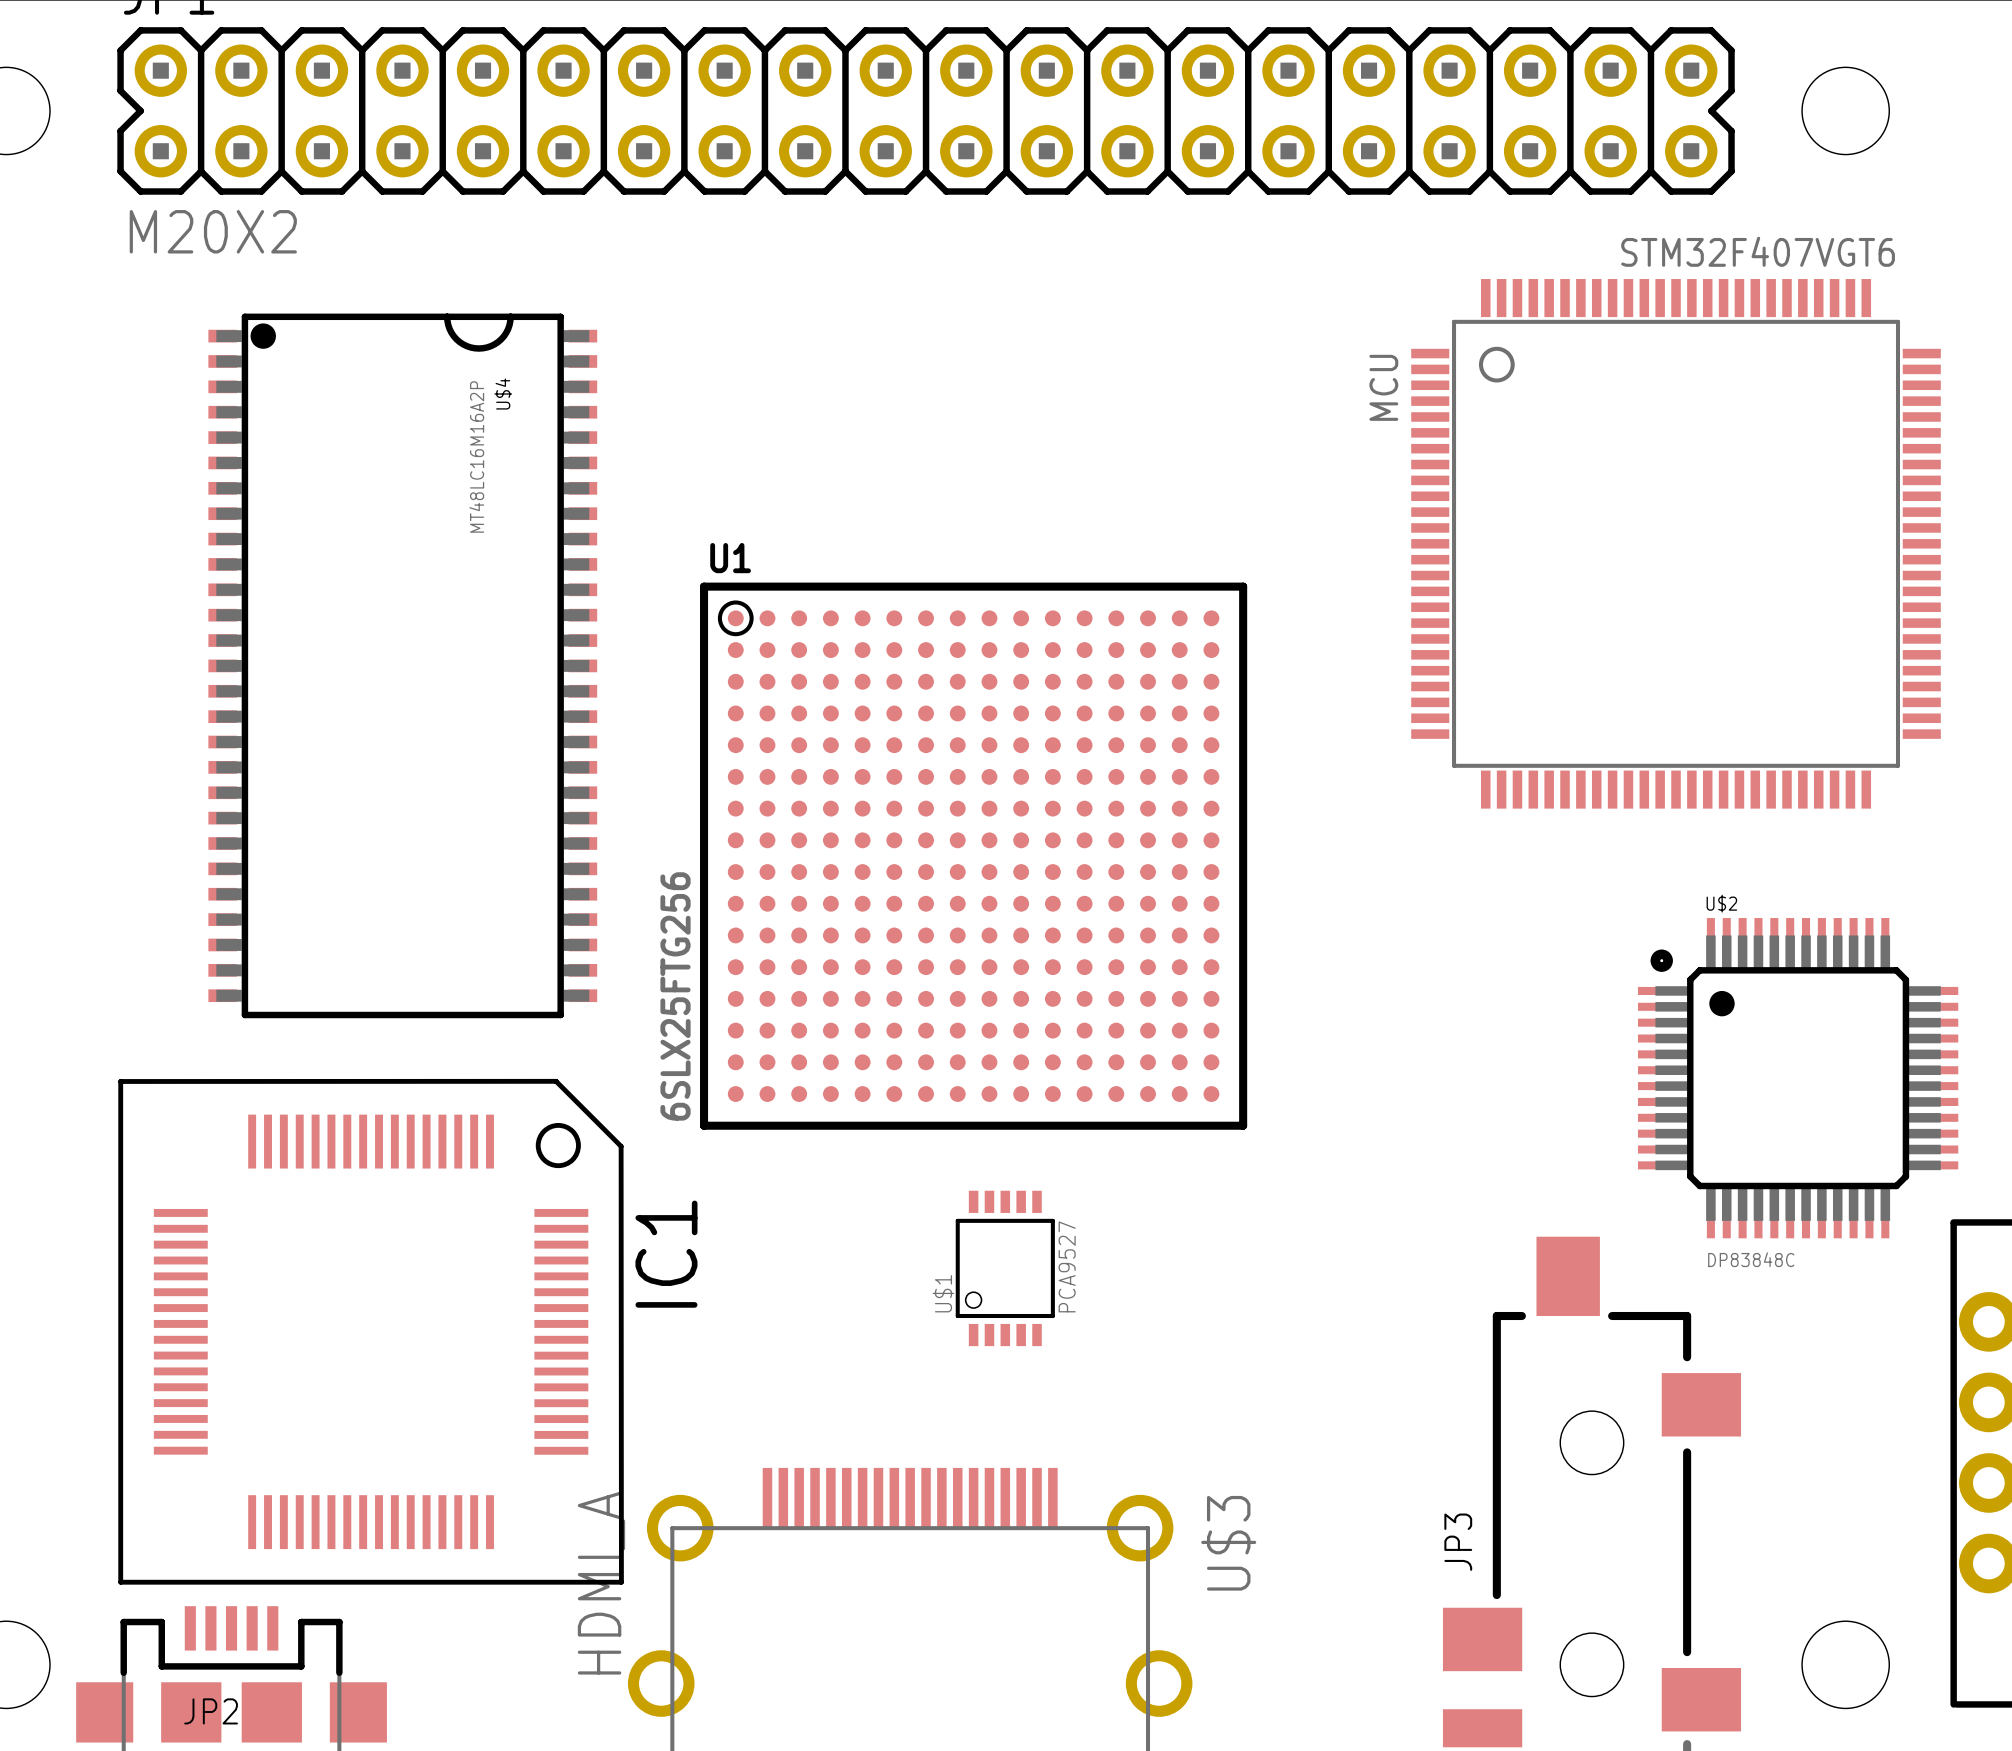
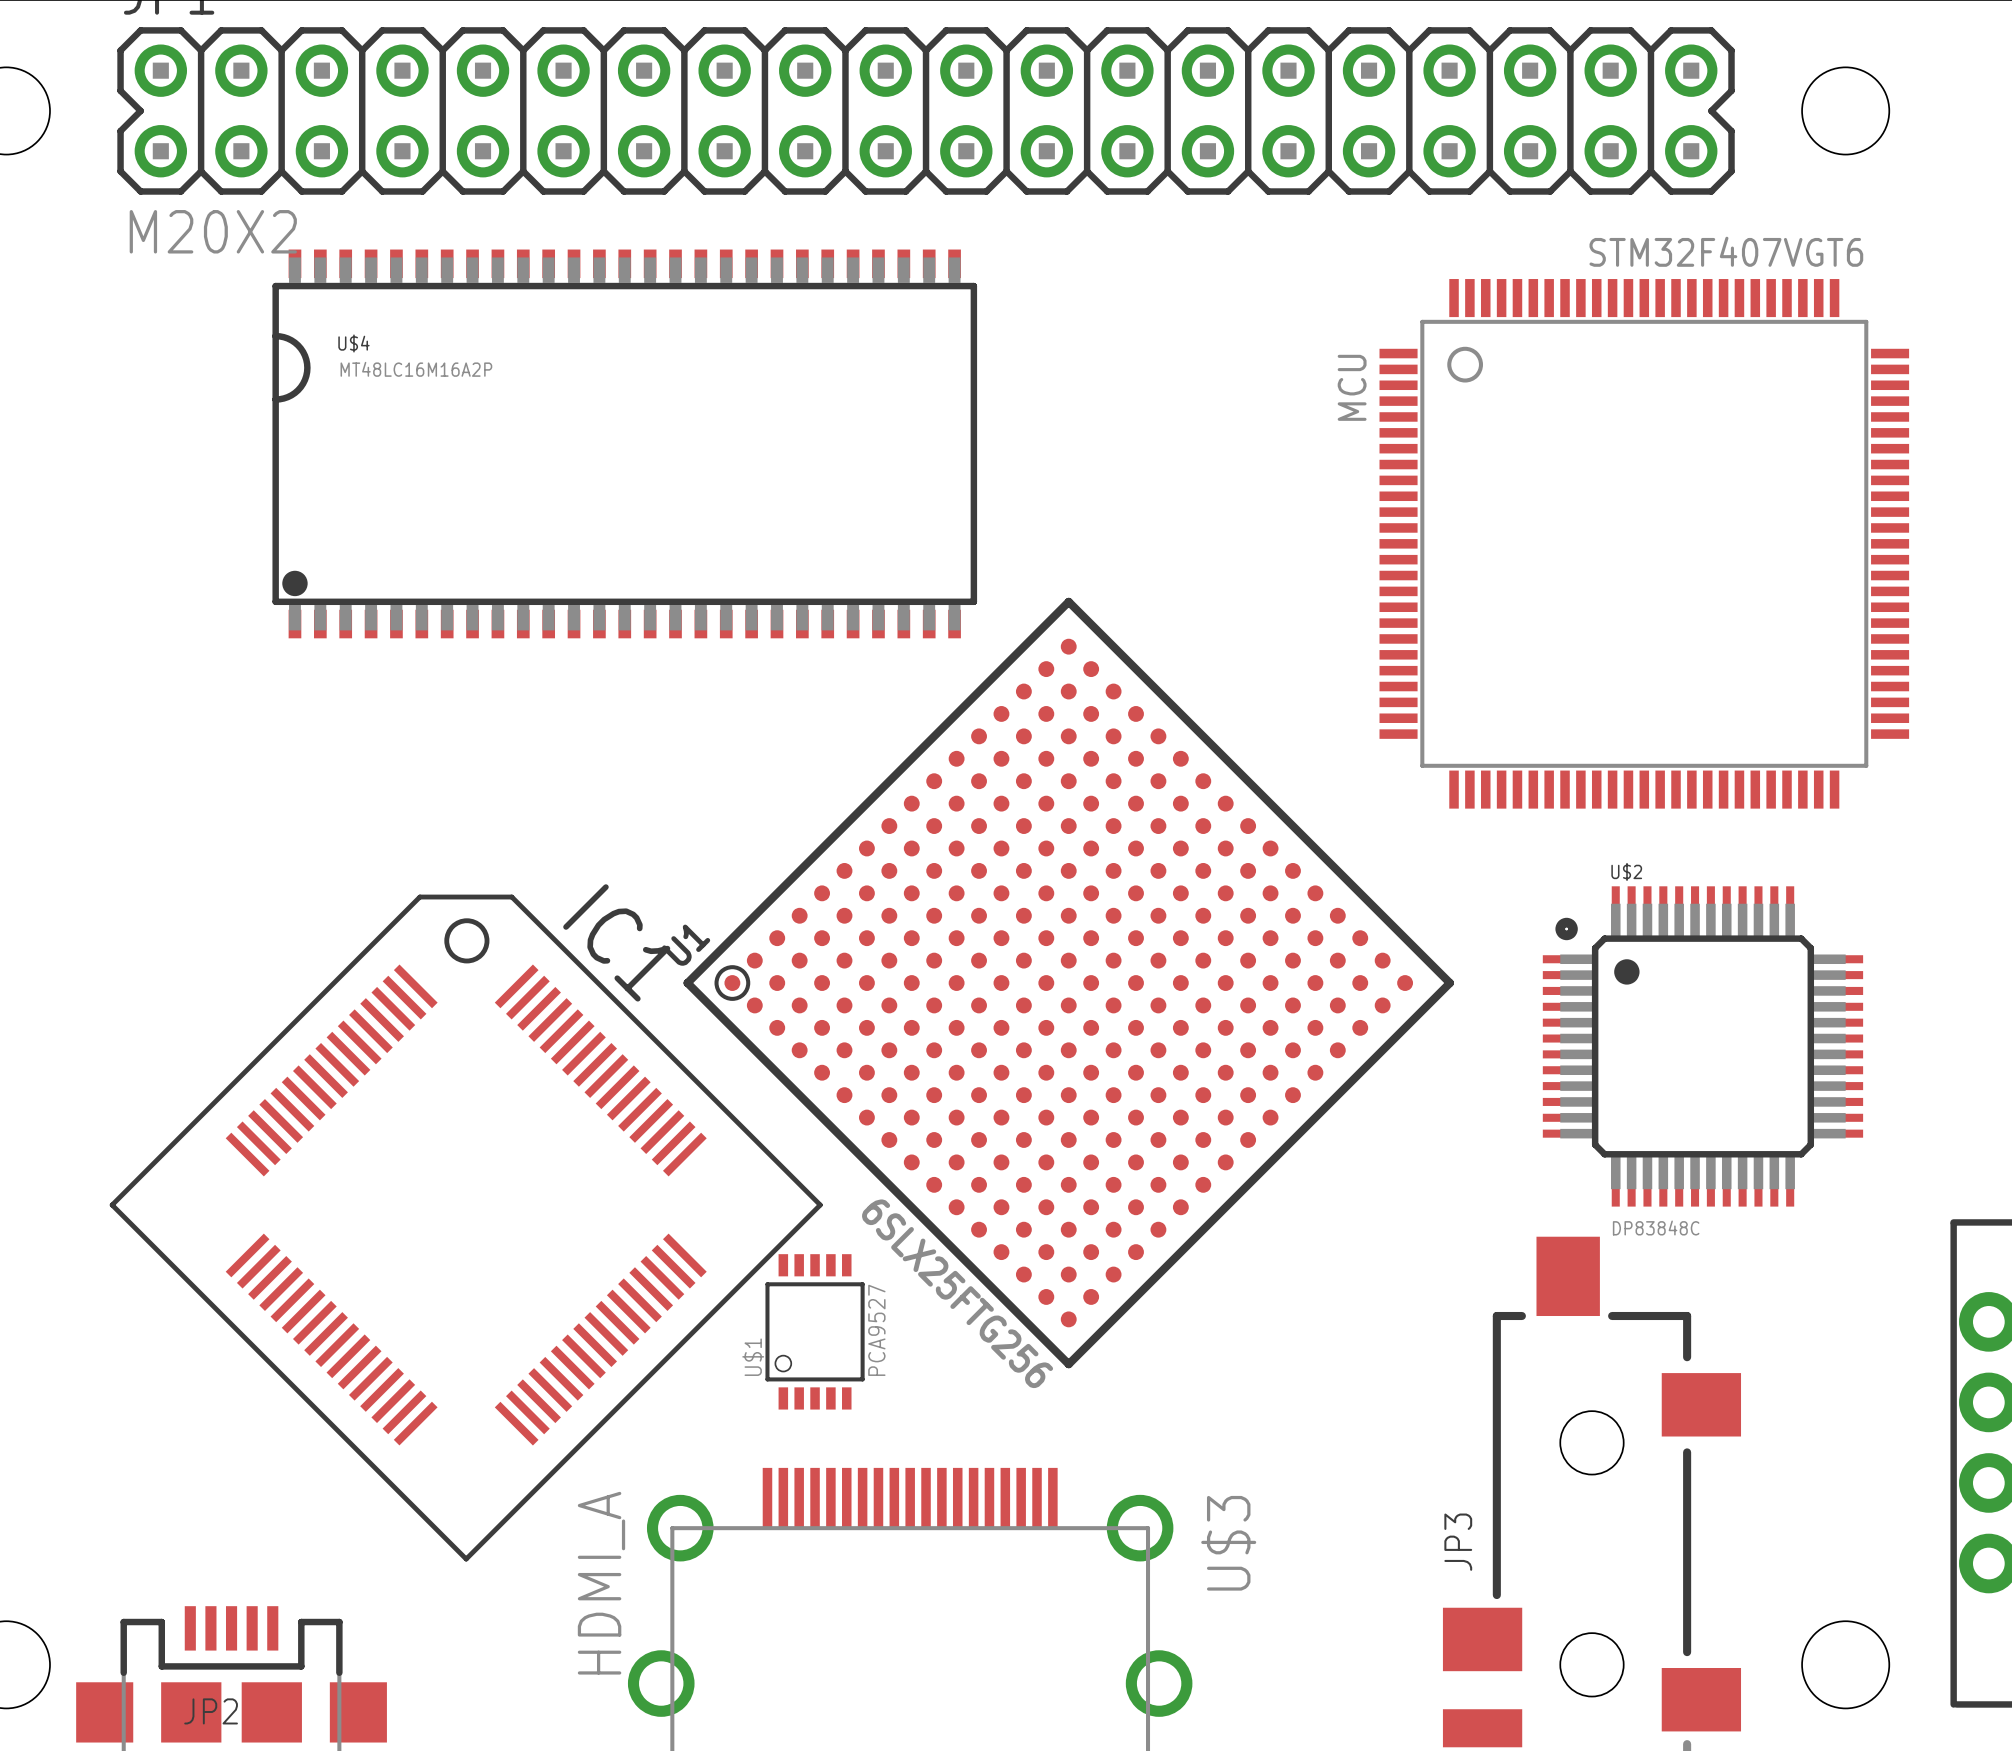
MCU position: (1676, 543) -> (1644, 543)
U$4 rotation: 0° (402, 665) -> 90° counterclockwise (624, 443)
U1 rotation: 0° (973, 856) -> 45° counterclockwise (1068, 983)
U$2 position: (1798, 1078) -> (1702, 1046)
U$1 position: (1005, 1268) -> (815, 1331)
IC1 rotation: 0° (371, 1331) -> 45° counterclockwise (466, 1228)

